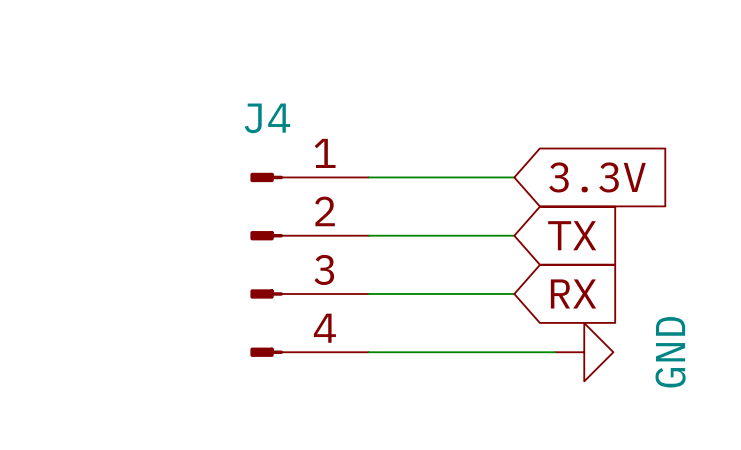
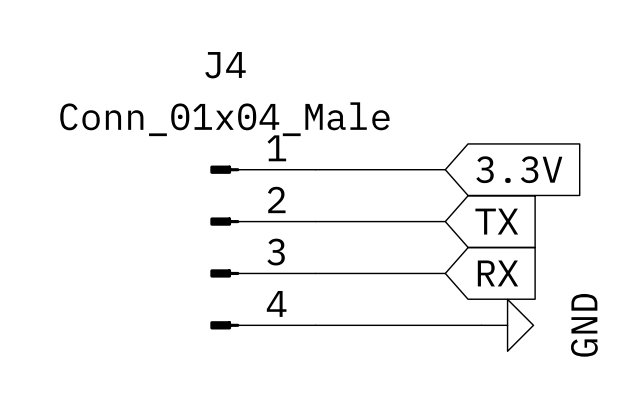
J4 name position: J4 (267, 118) -> J4 (225, 65)
J4 value: none -> Conn_01x04_Male (224, 119)

